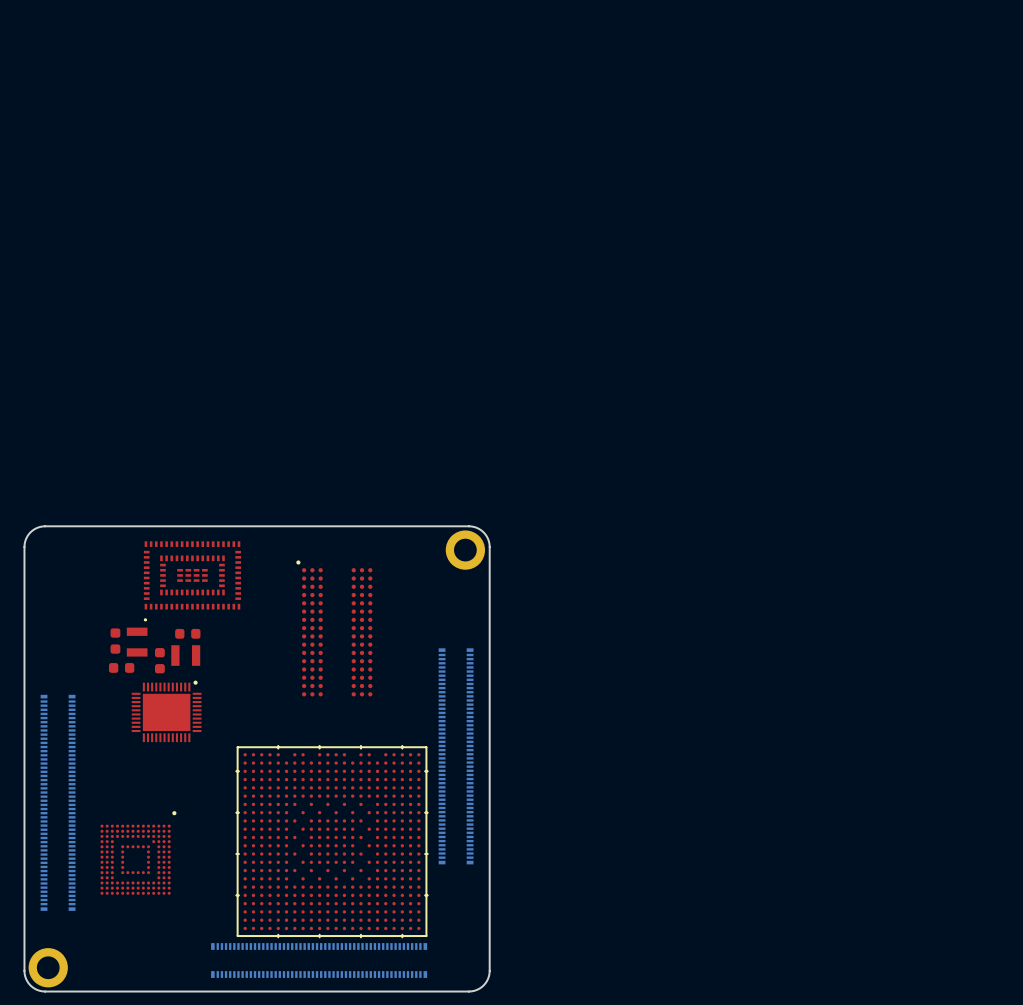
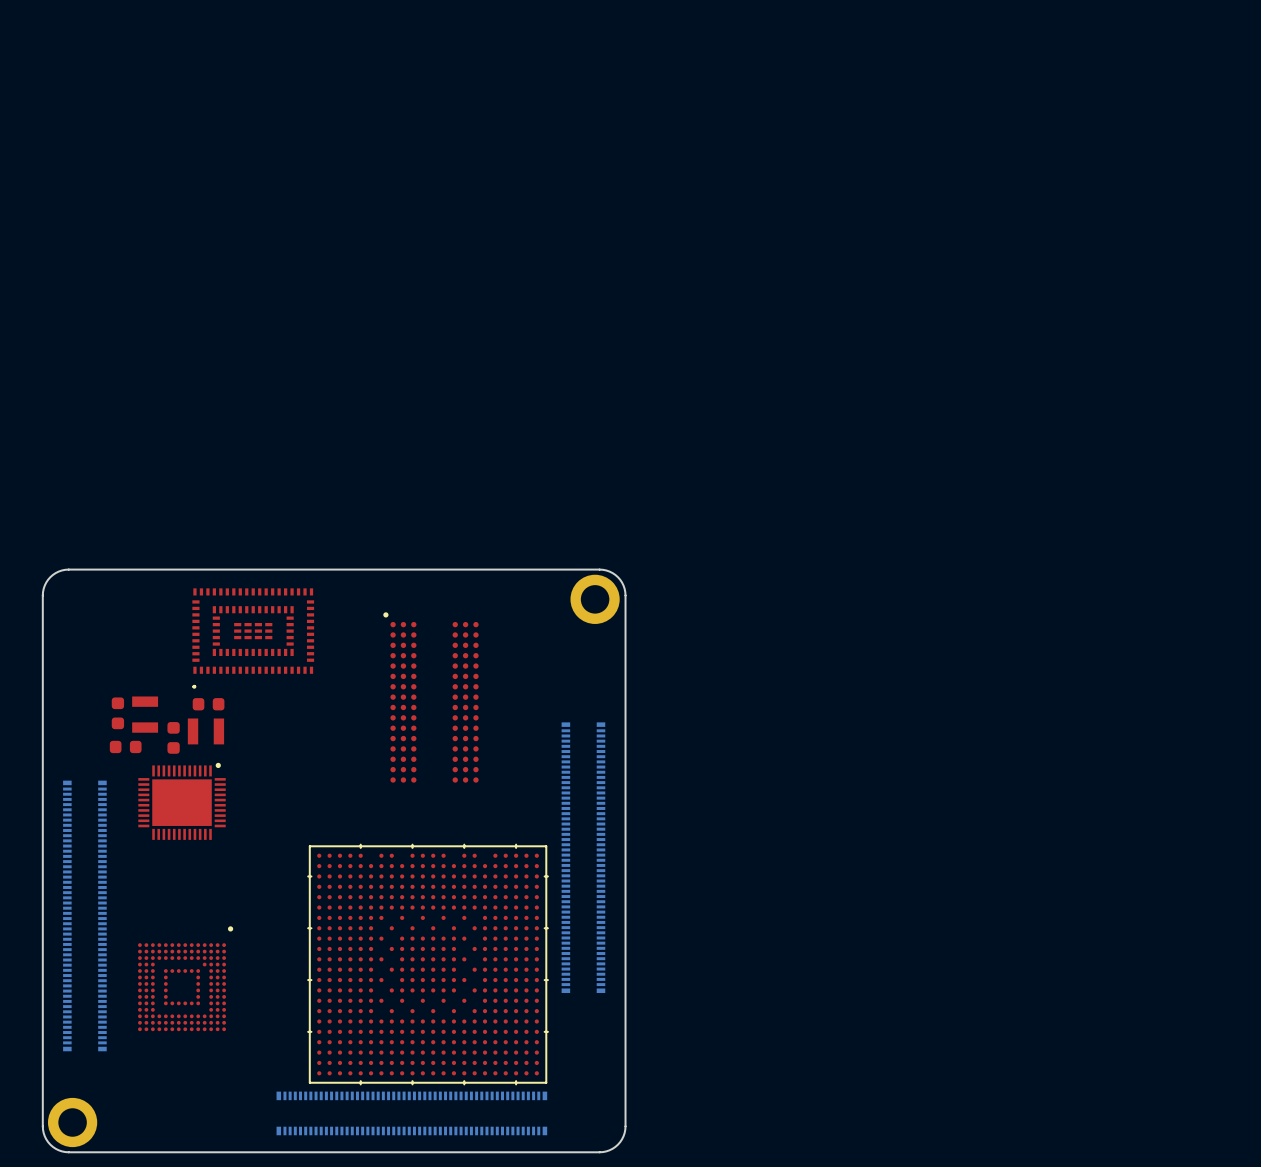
part footprint: [110, 628, 121, 654] -> [132, 696, 159, 733]
part: none -> (208, 704)
part: (187, 633) -> none
part: none -> (117, 713)
part: (137, 642) -> none
part footprint: [154, 648, 165, 674] -> [187, 718, 225, 745]
part: (185, 655) -> none
part: none -> (125, 746)
part rotation: 0° (121, 667) -> 90° clockwise (173, 737)
part position: (166, 711) -> (182, 801)

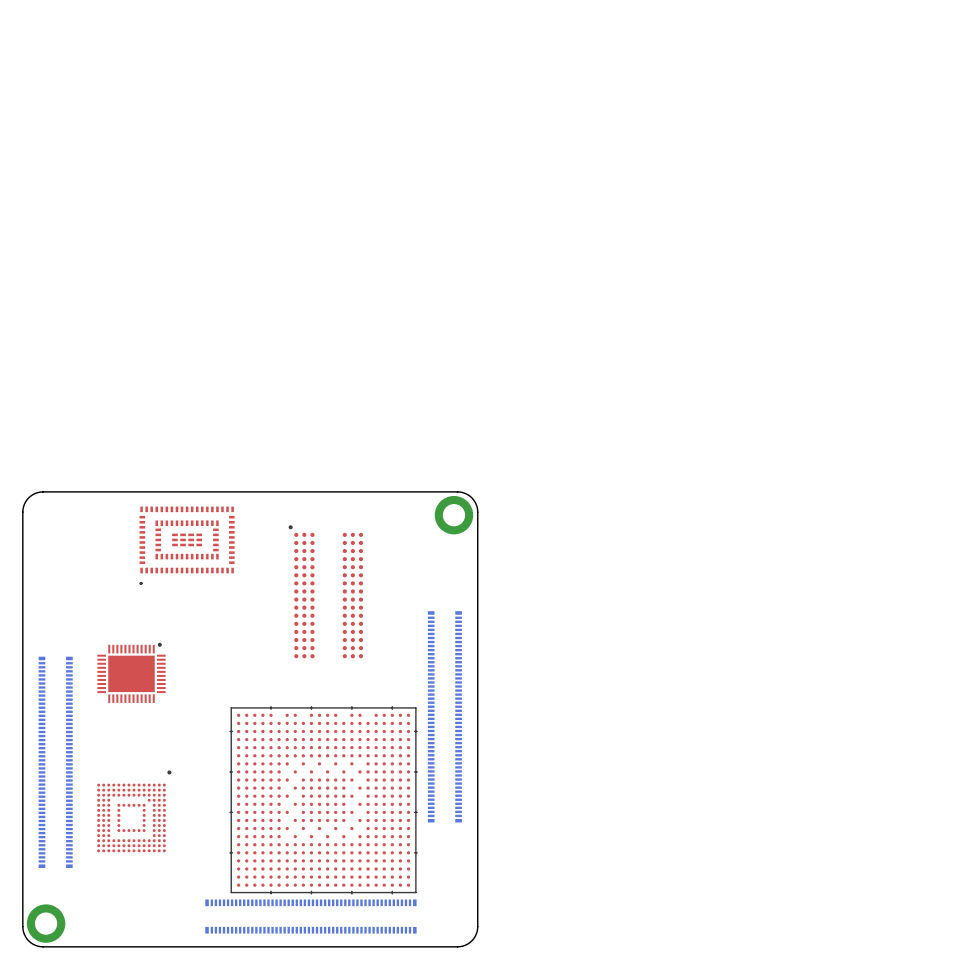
part: (208, 704) -> none
part: (117, 713) -> none
part: (145, 714) -> none
part: (205, 731) -> none
part: (173, 737) -> none
part: (125, 746) -> none

